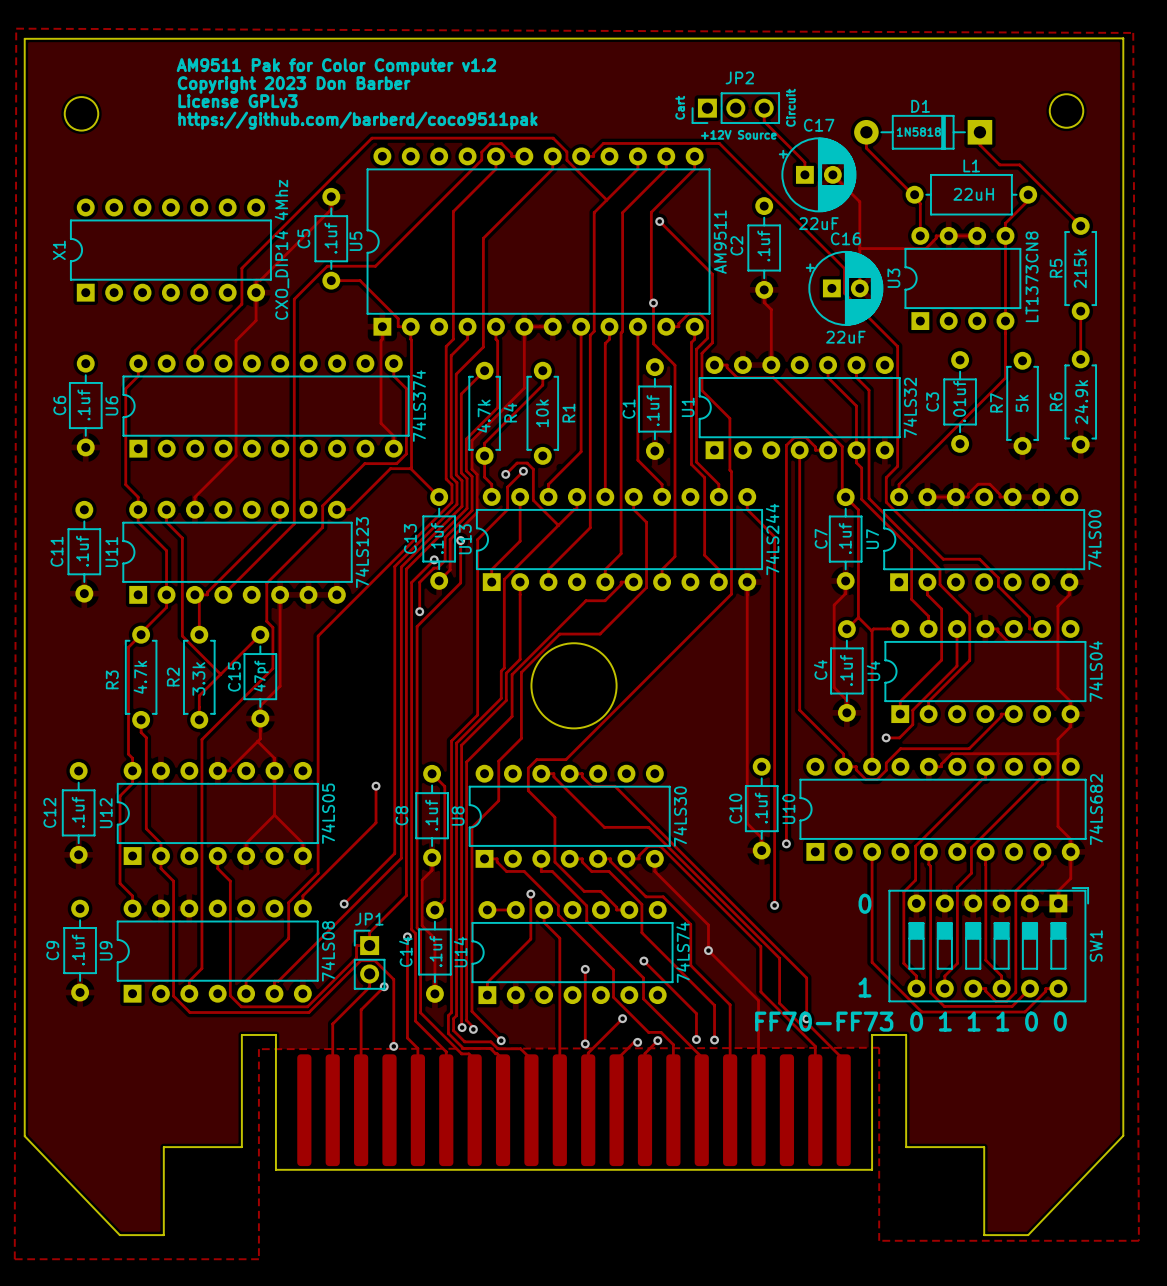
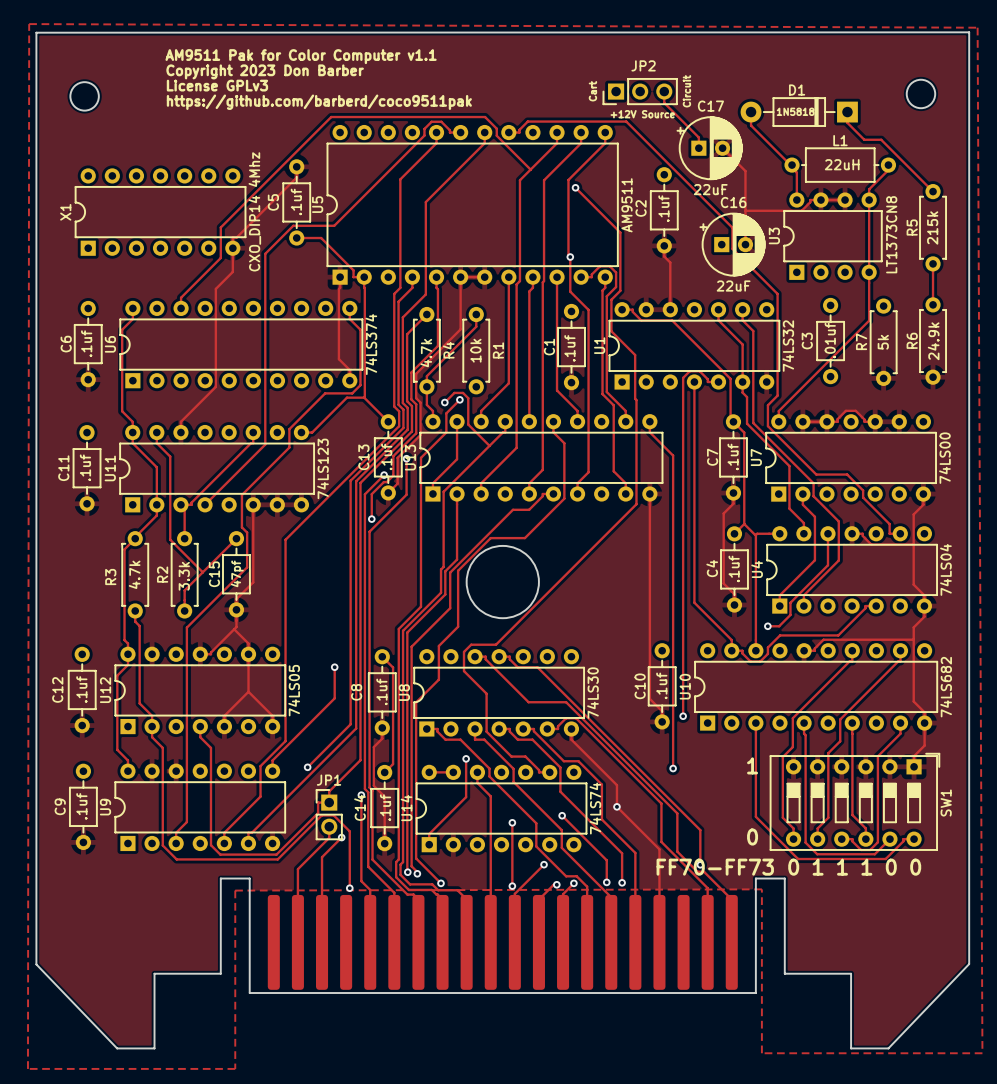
text: AM9511 Pak for Color Computer v1.2 (336, 66) -> AM9511 Pak for Color Computer v1.1 (301, 56)
U13 value: 74LS244 (772, 539) -> none
text: 0 (864, 903) -> 1 (752, 765)
U9 value: 74LS08 (328, 951) -> none
text: 1 (864, 987) -> 0 (752, 837)

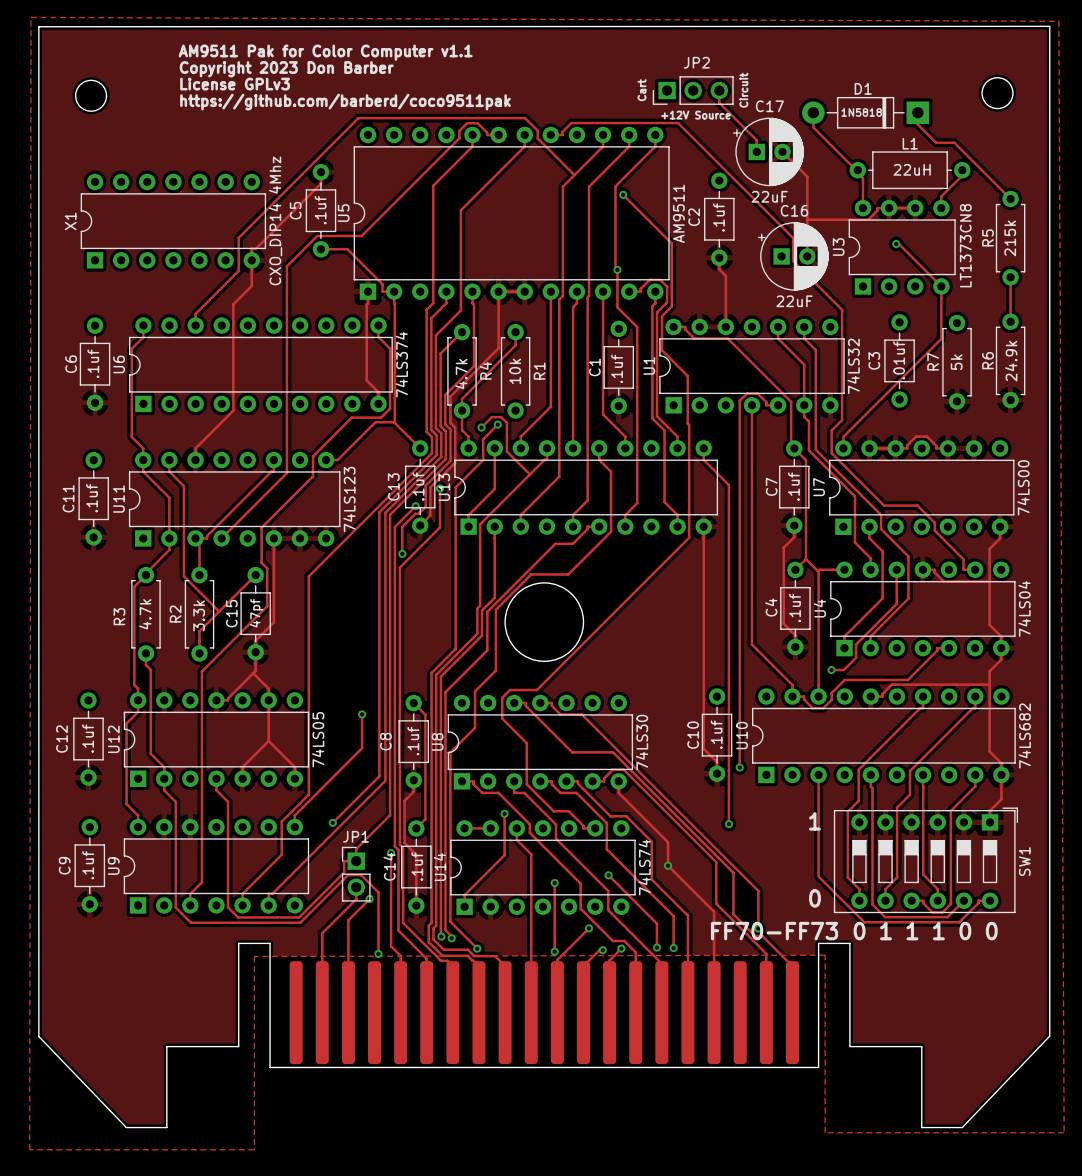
track: (869, 200) (869, 272) -> (896, 243) (898, 243) (941, 286)
via: none -> (896, 243)

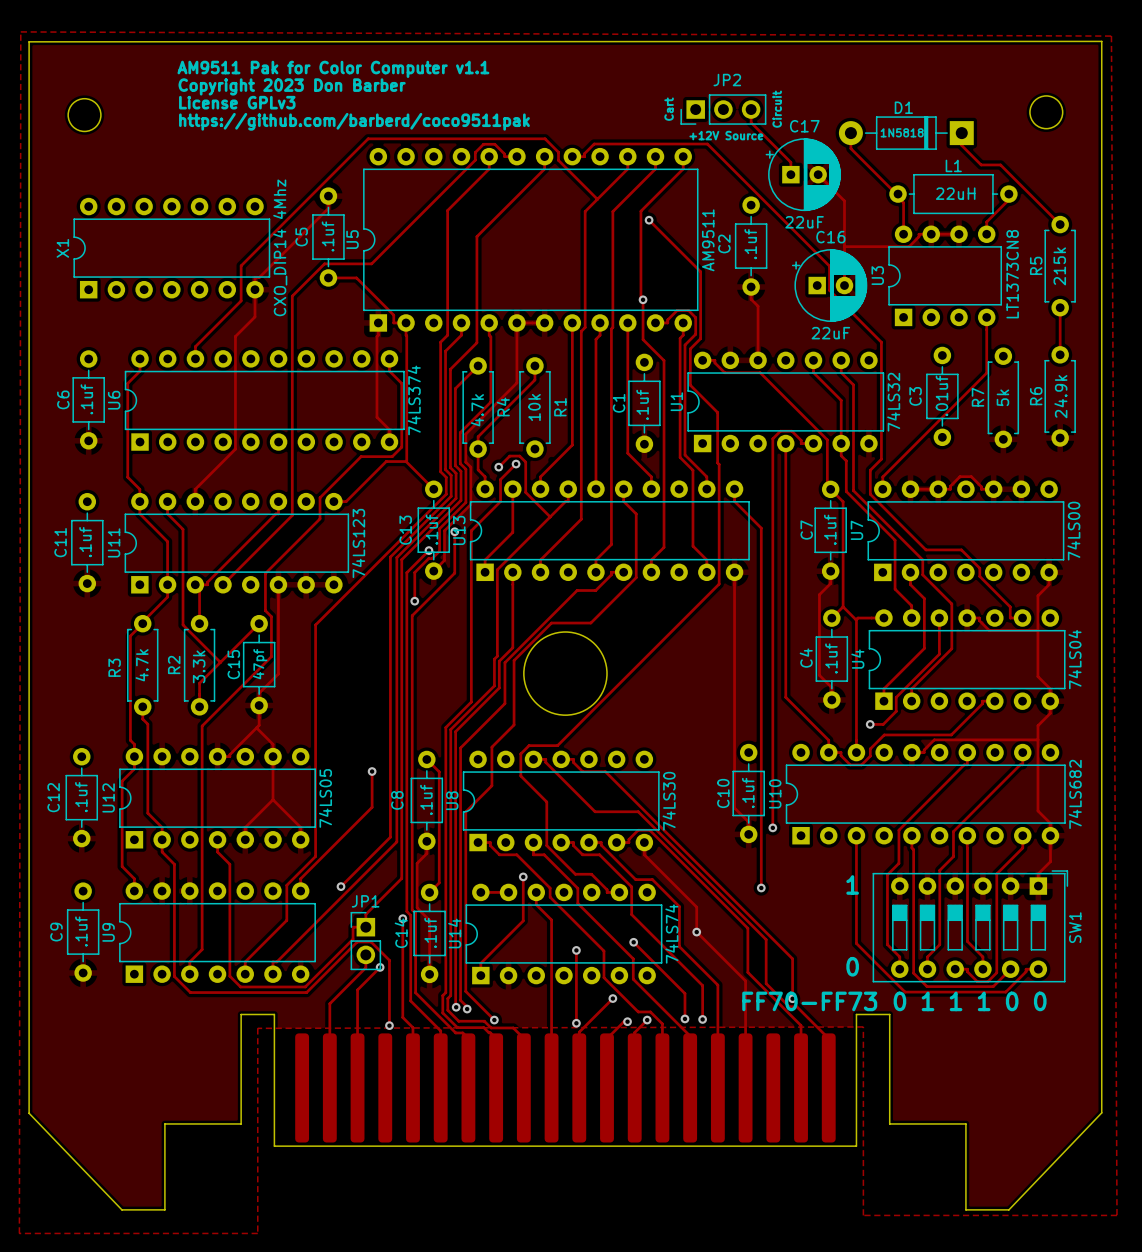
track: (896, 243) (898, 243) (941, 286) -> none
via: (896, 243) -> none

